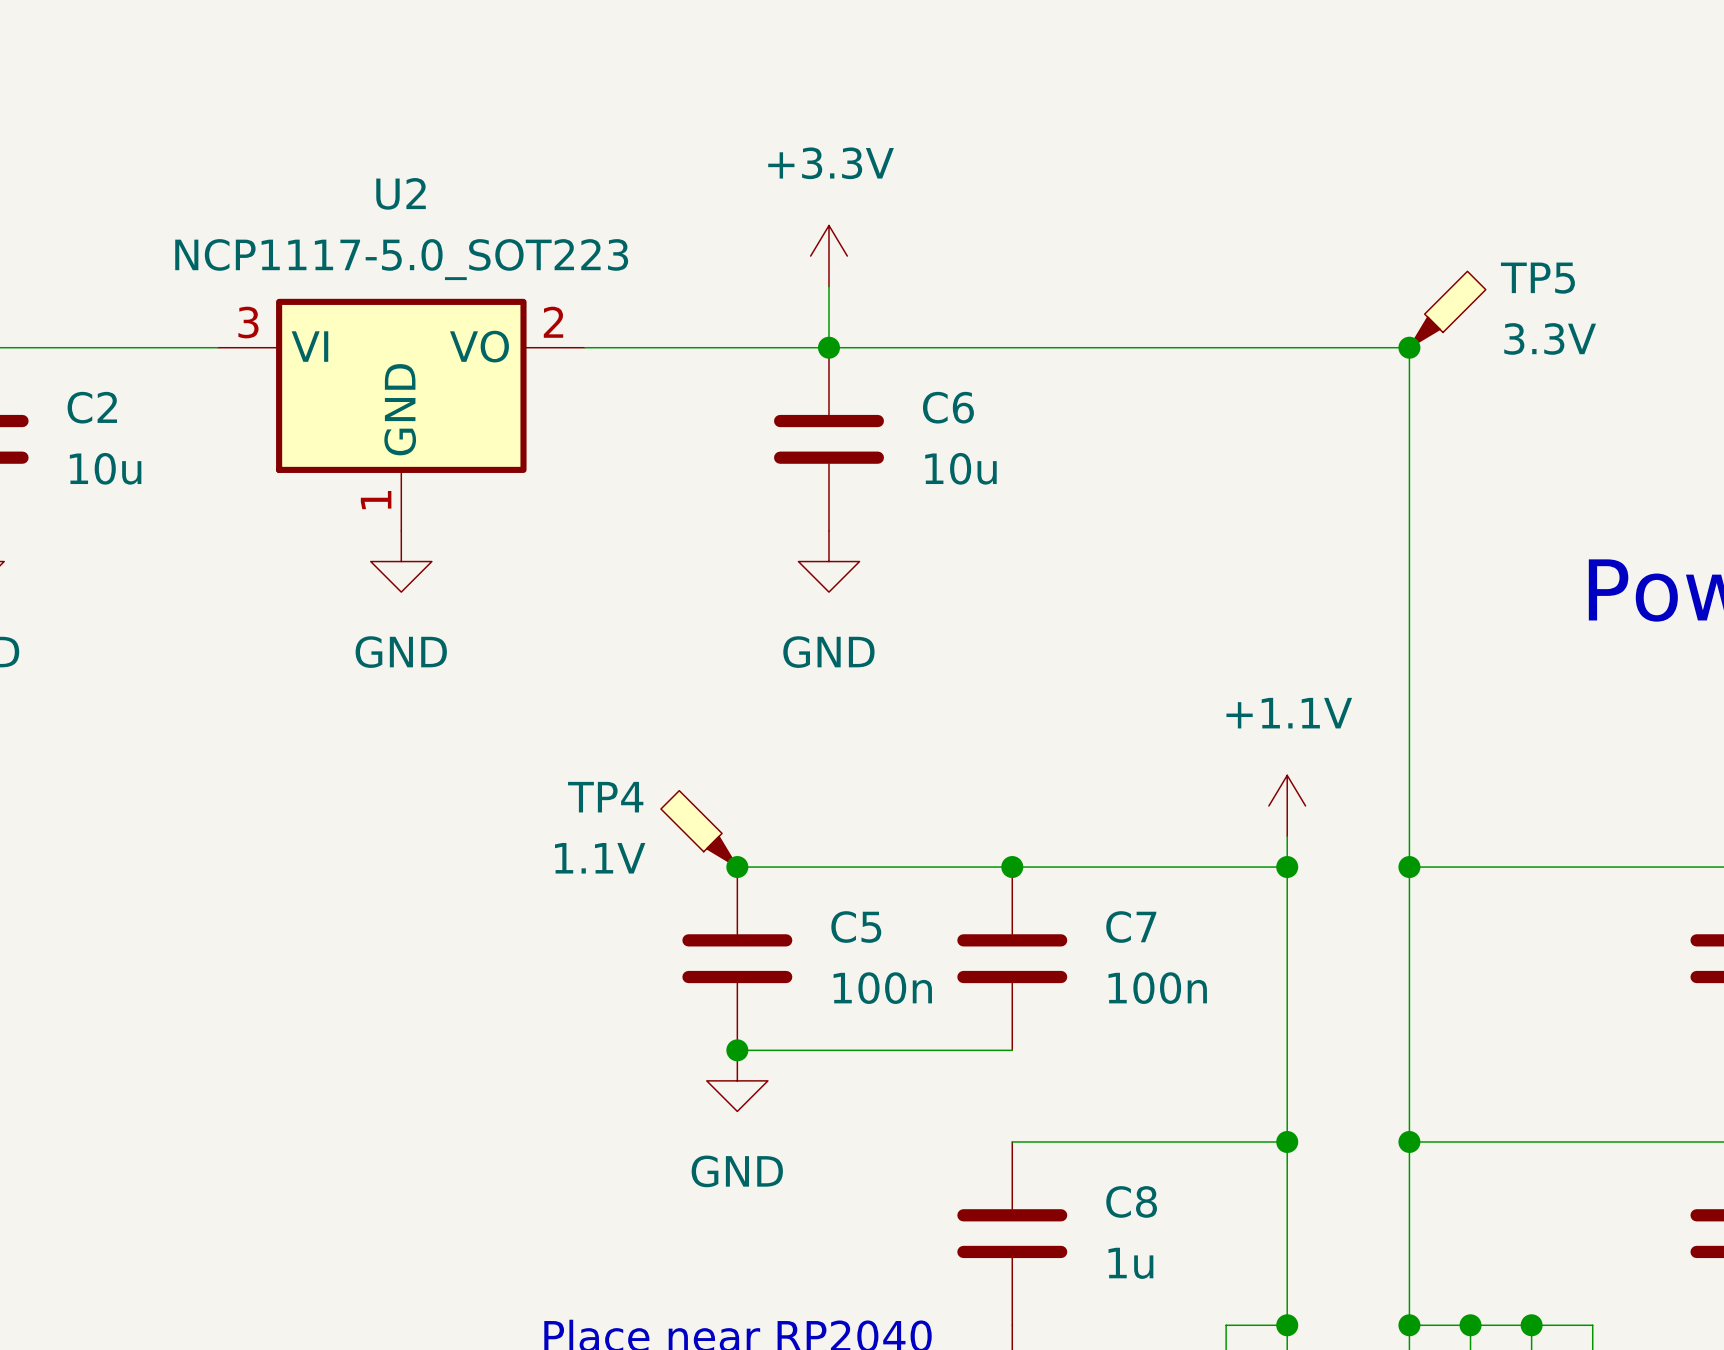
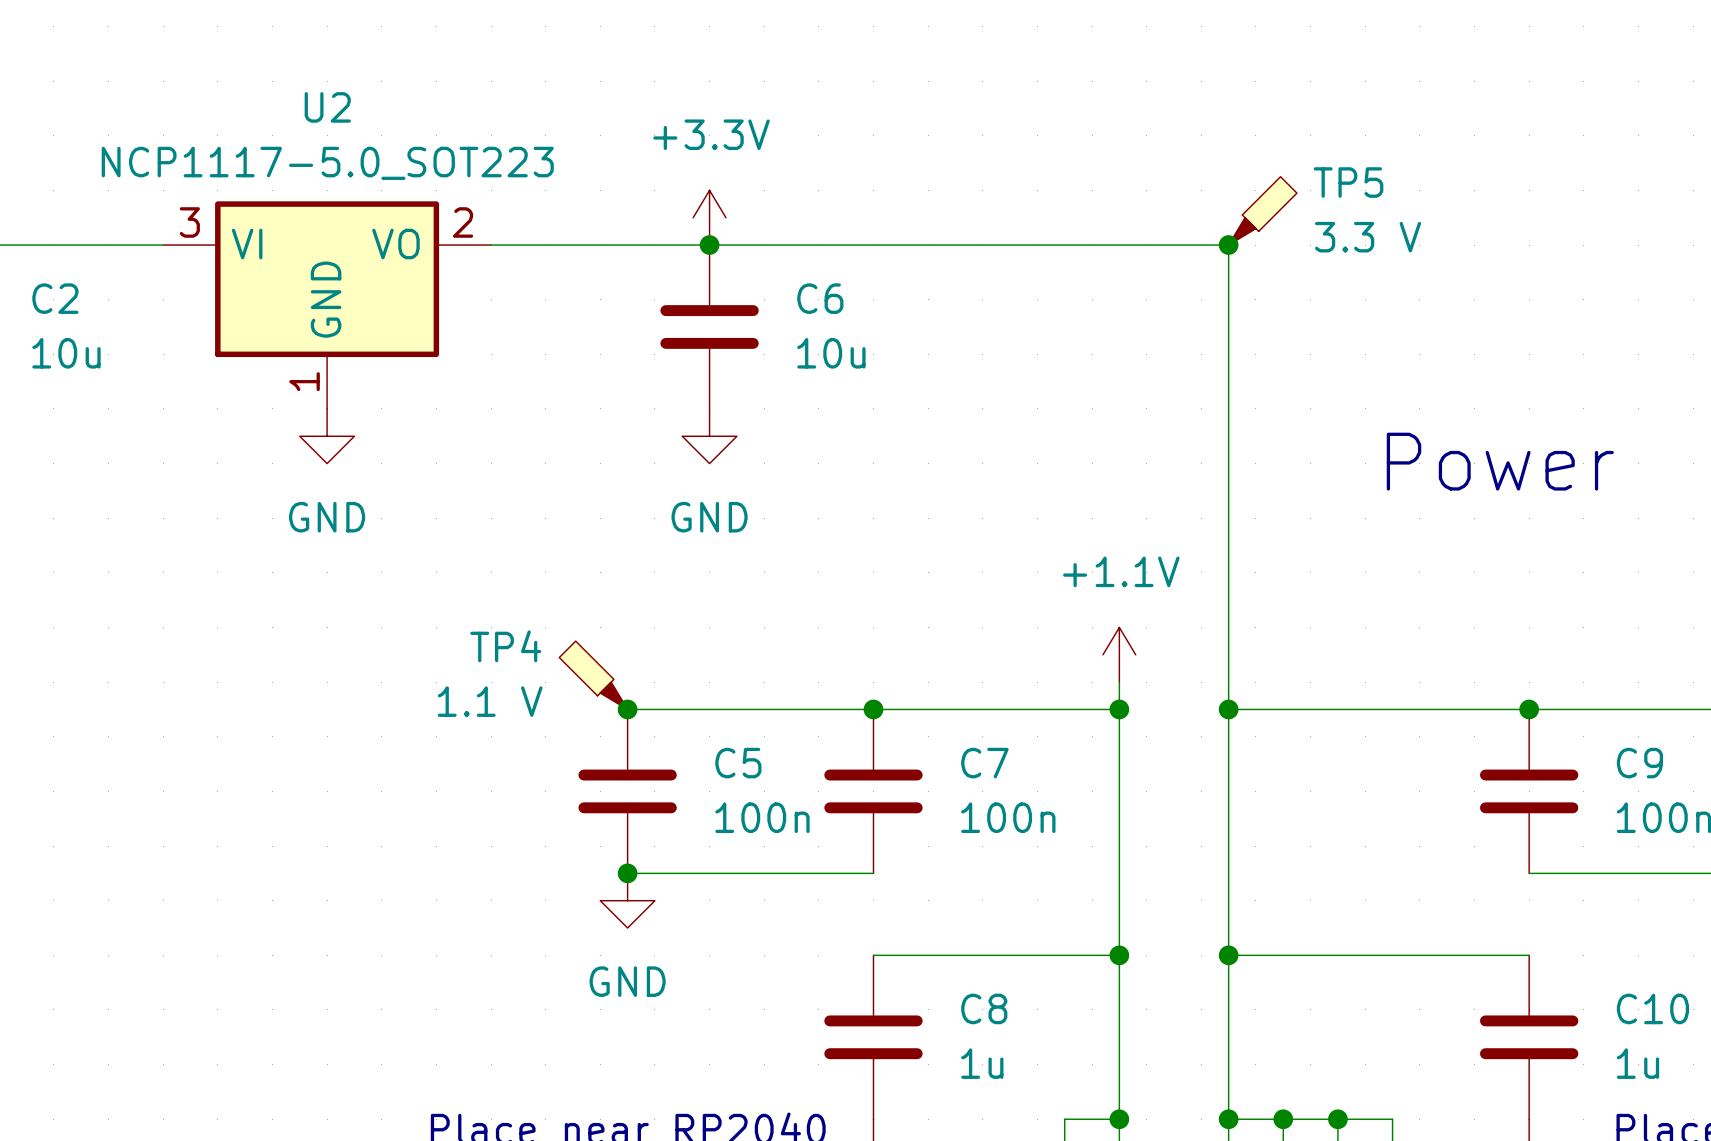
power symbol position: +3.3V (828, 256) -> +3.3V (709, 217)
TP5 value: 3.3V (1550, 338) -> 3.3 V (1368, 237)
TP4 value: 1.1V (600, 858) -> 1.1 V (490, 701)

